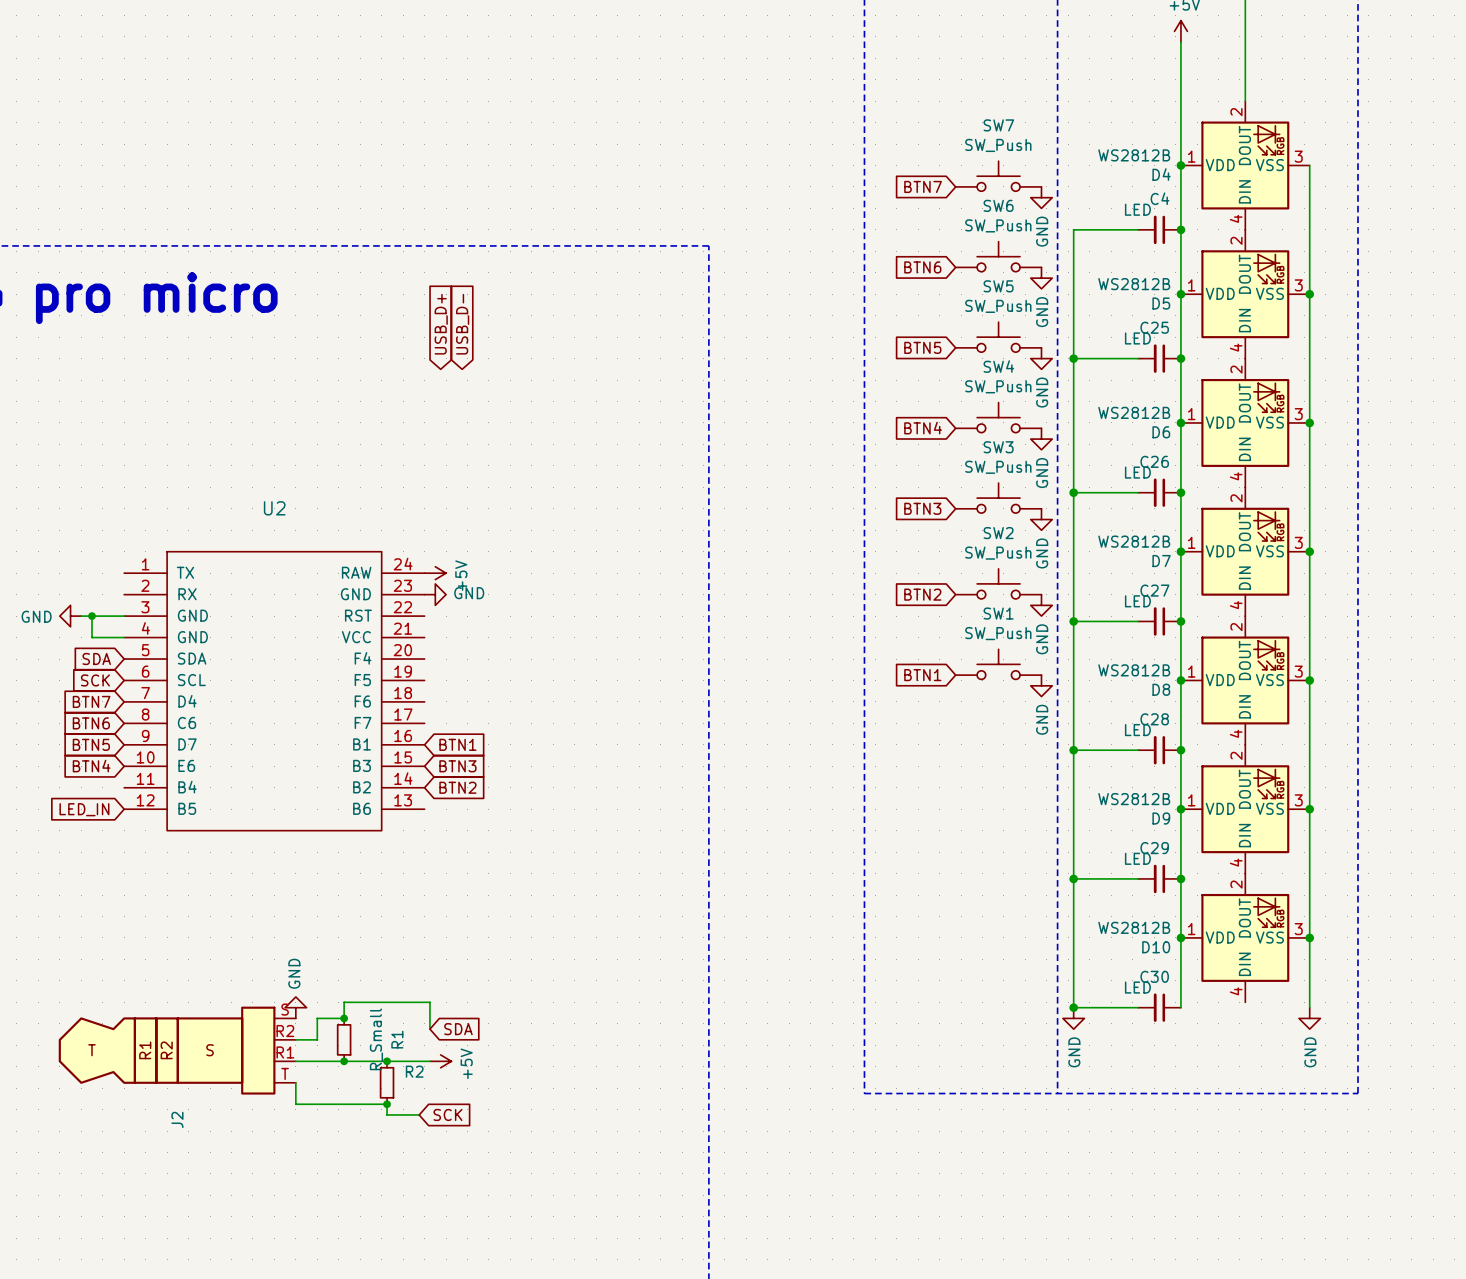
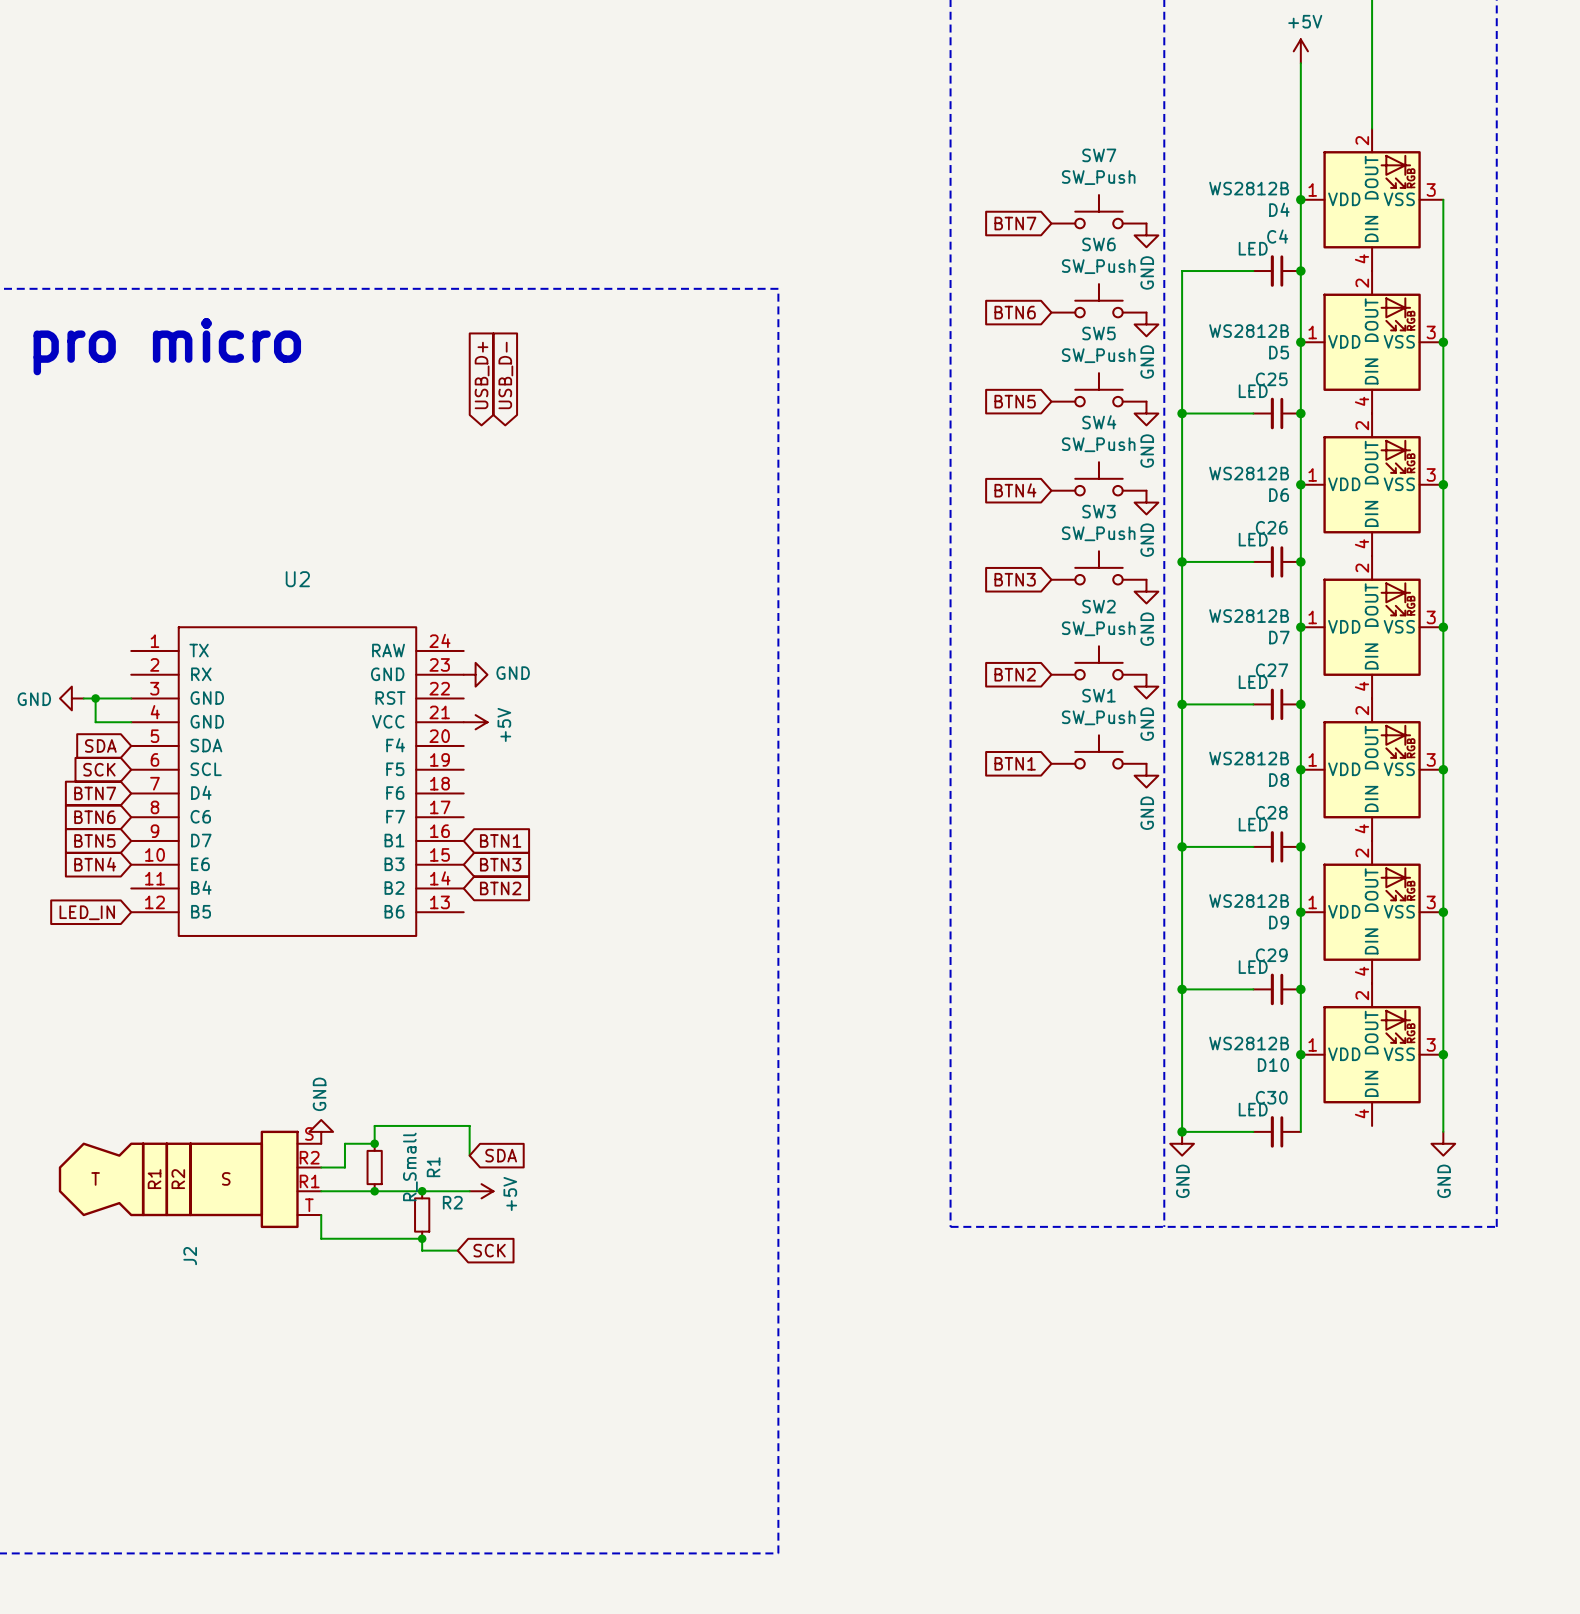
power symbol position: +5V (435, 573) -> +5V (475, 722)

